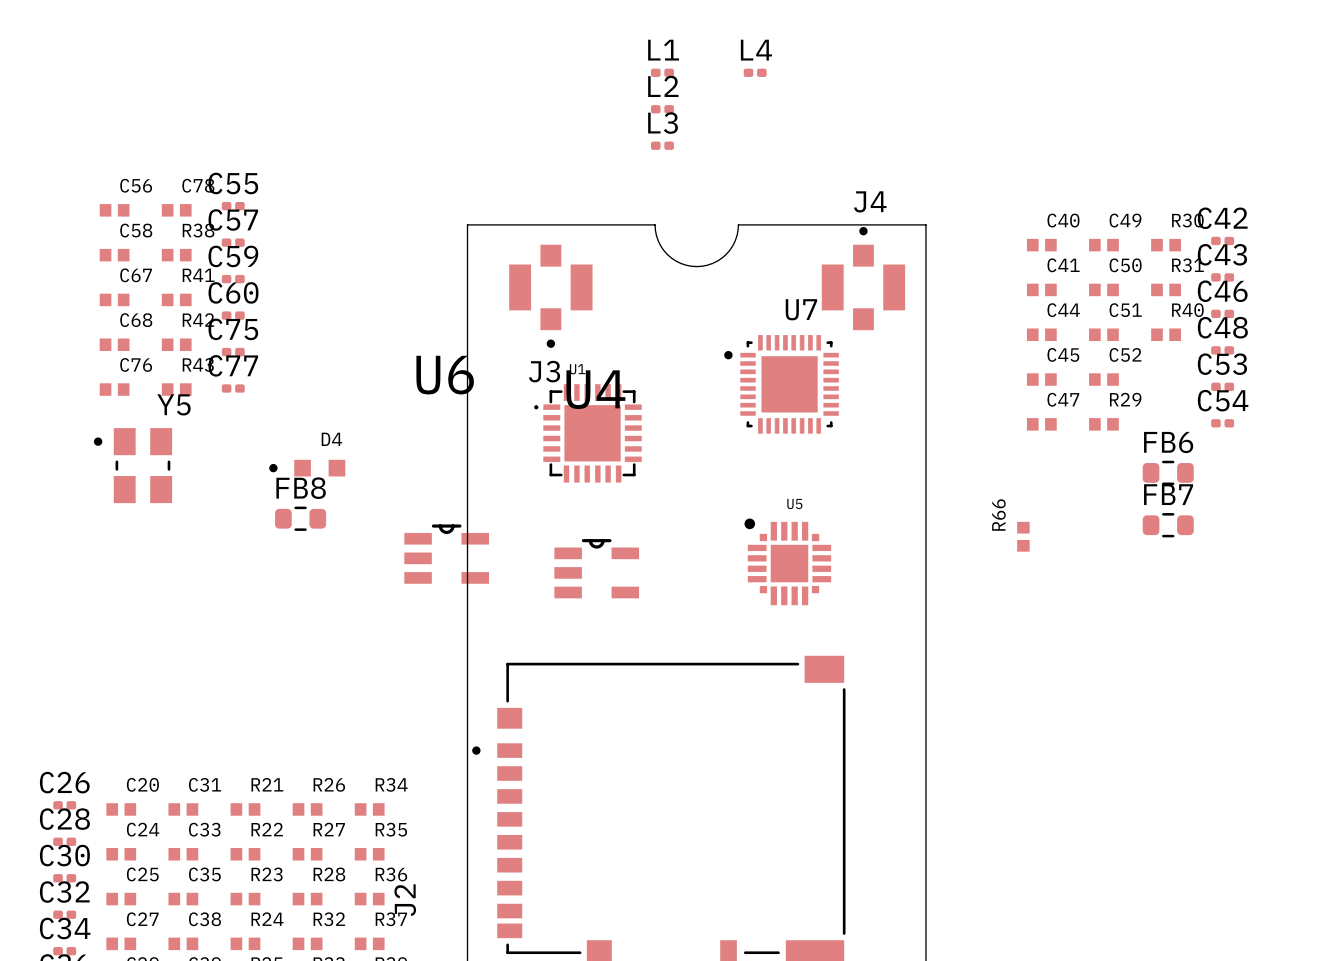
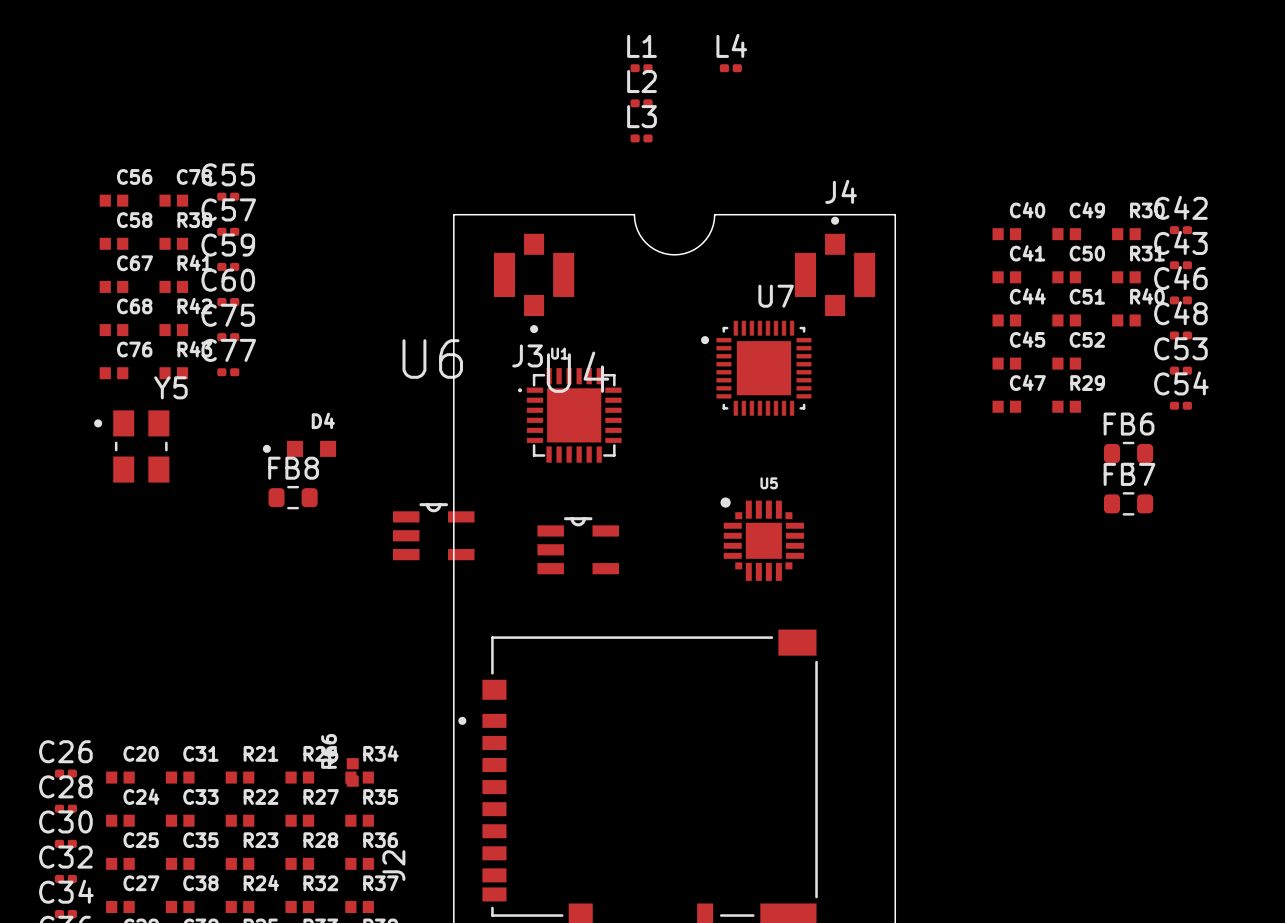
R66 position: (1023, 536) -> (352, 772)

